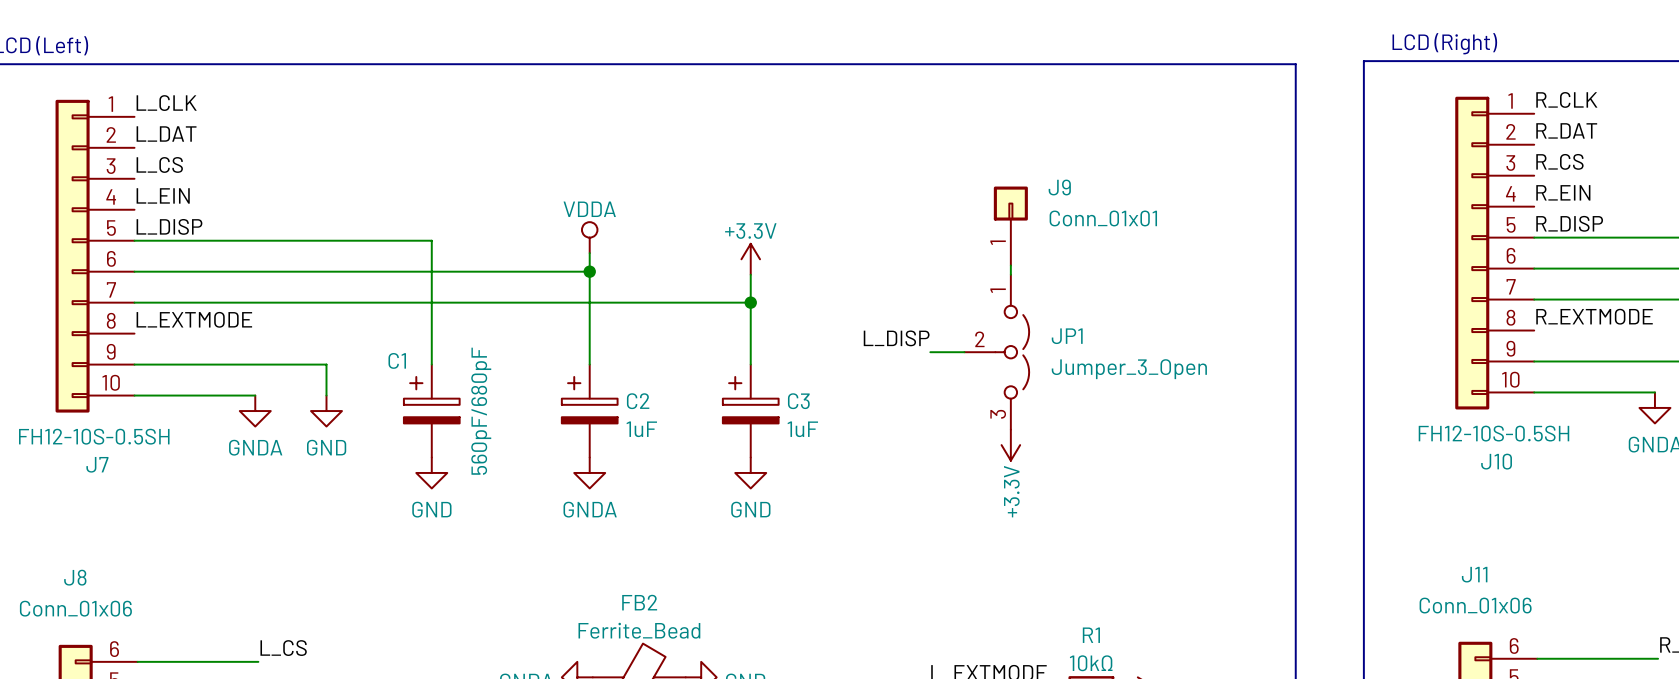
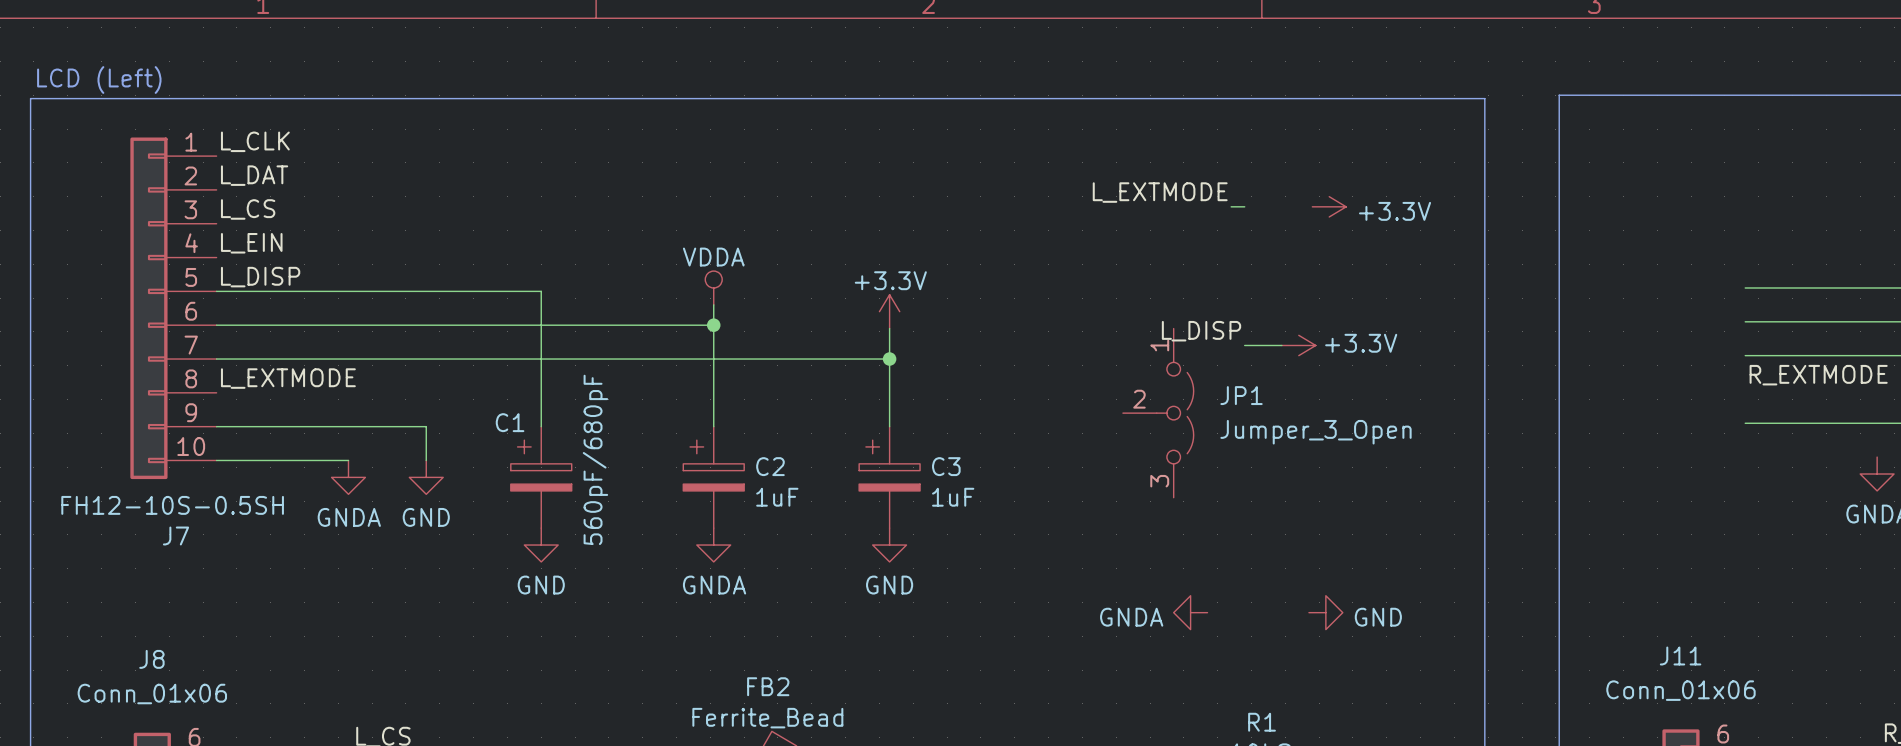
text: LCD (Right) (1444, 43) -> none
label: R_CLK (1566, 99) -> none
label: R_DAT (1566, 130) -> none
label: none -> L_EXTMODE (1160, 192)
label: R_CS (1559, 161) -> none
wire: none -> (1231, 206) (1244, 206)
power symbol: none -> +3.3V (1329, 206)
label: R_EIN (1563, 192) -> none
label: R_DISP (1569, 223) -> none
J9: Conn_01x01 (1010, 226) -> none
J10: FH12-10S-0.5SH (1494, 253) -> none
wire: (1010, 265) (1010, 274) -> none
power symbol: none -> +3.3V (1298, 345)
label position: L_DISP (896, 338) -> L_DISP (1201, 331)
wire: (930, 352) (964, 352) -> (1244, 345) (1281, 345)
wire: (1534, 392) (1654, 392) -> none
power symbol: +3.3V (1010, 445) -> none
power symbol: none -> GNDA (1190, 612)
power symbol: none -> GND (1325, 612)

